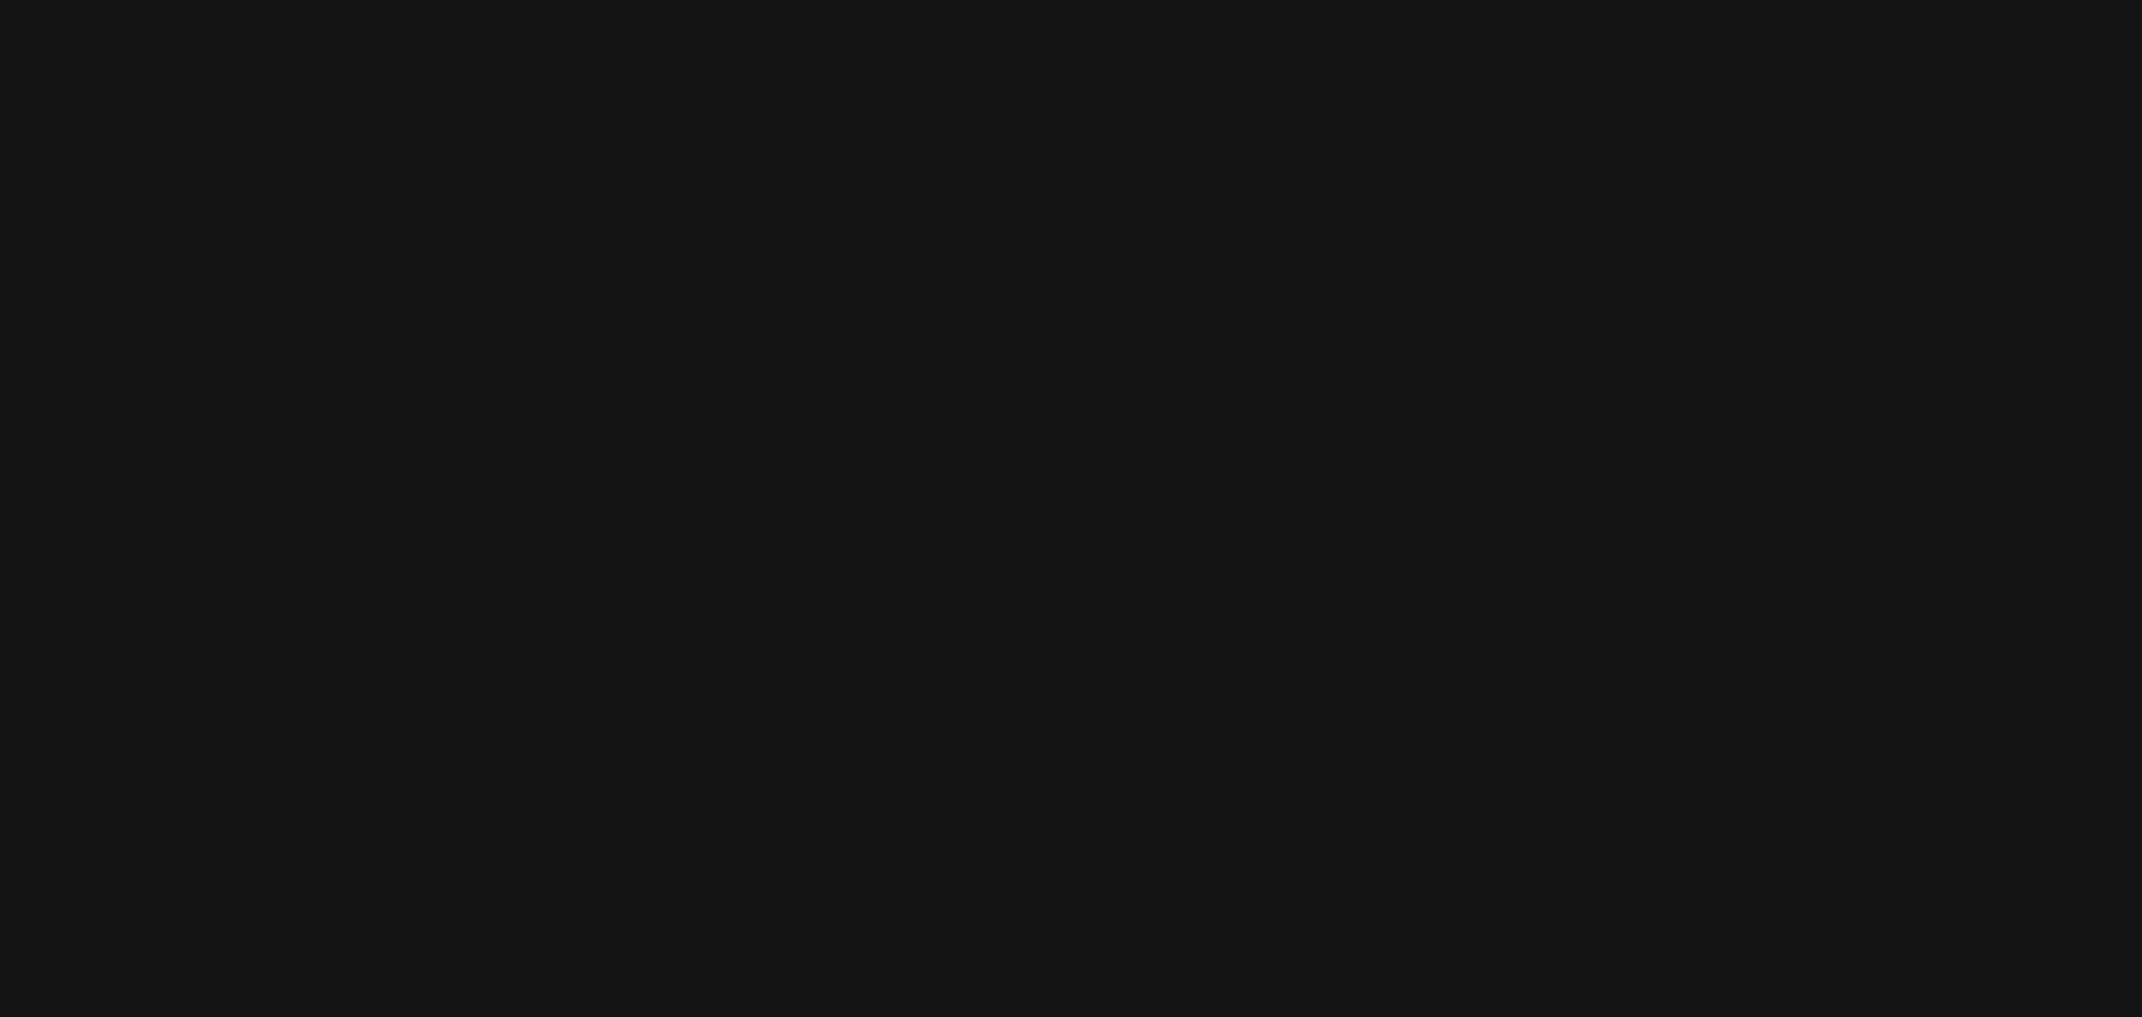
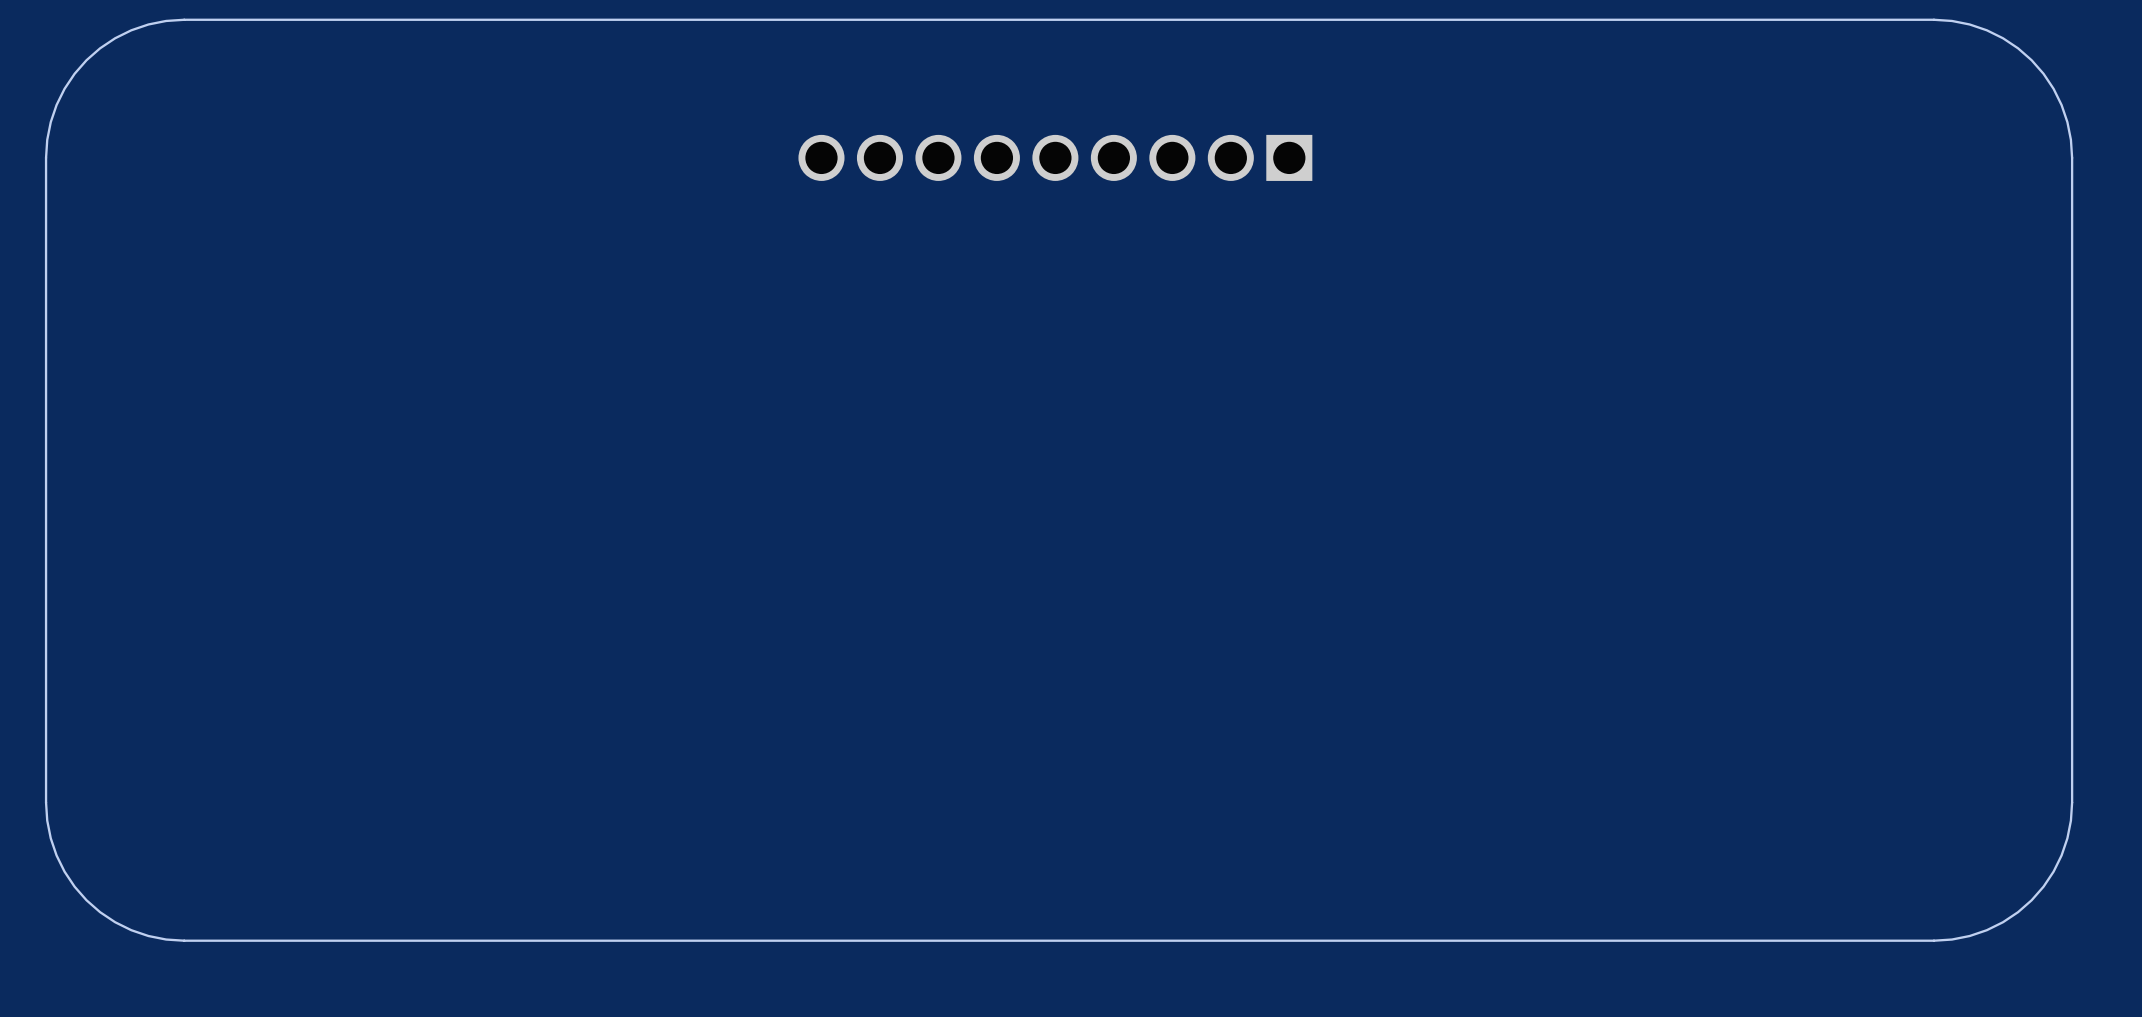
board edge: none -> (1933, 19) (184, 19) (166, 20) (131, 30) (100, 48) (74, 73) (56, 105) (47, 139) (46, 802) (50, 838) (56, 855) (74, 886) (100, 912) (115, 922) (148, 936) (184, 940) (1933, 940) (1952, 939) (1986, 930) (2018, 912) (2043, 886) (2061, 855) (2070, 820) (2072, 157) (2070, 139) (2061, 105) (2053, 88) (2031, 60) (2018, 48) (1986, 30) (1969, 24) (1933, 19)
part: none -> (1055, 157)

